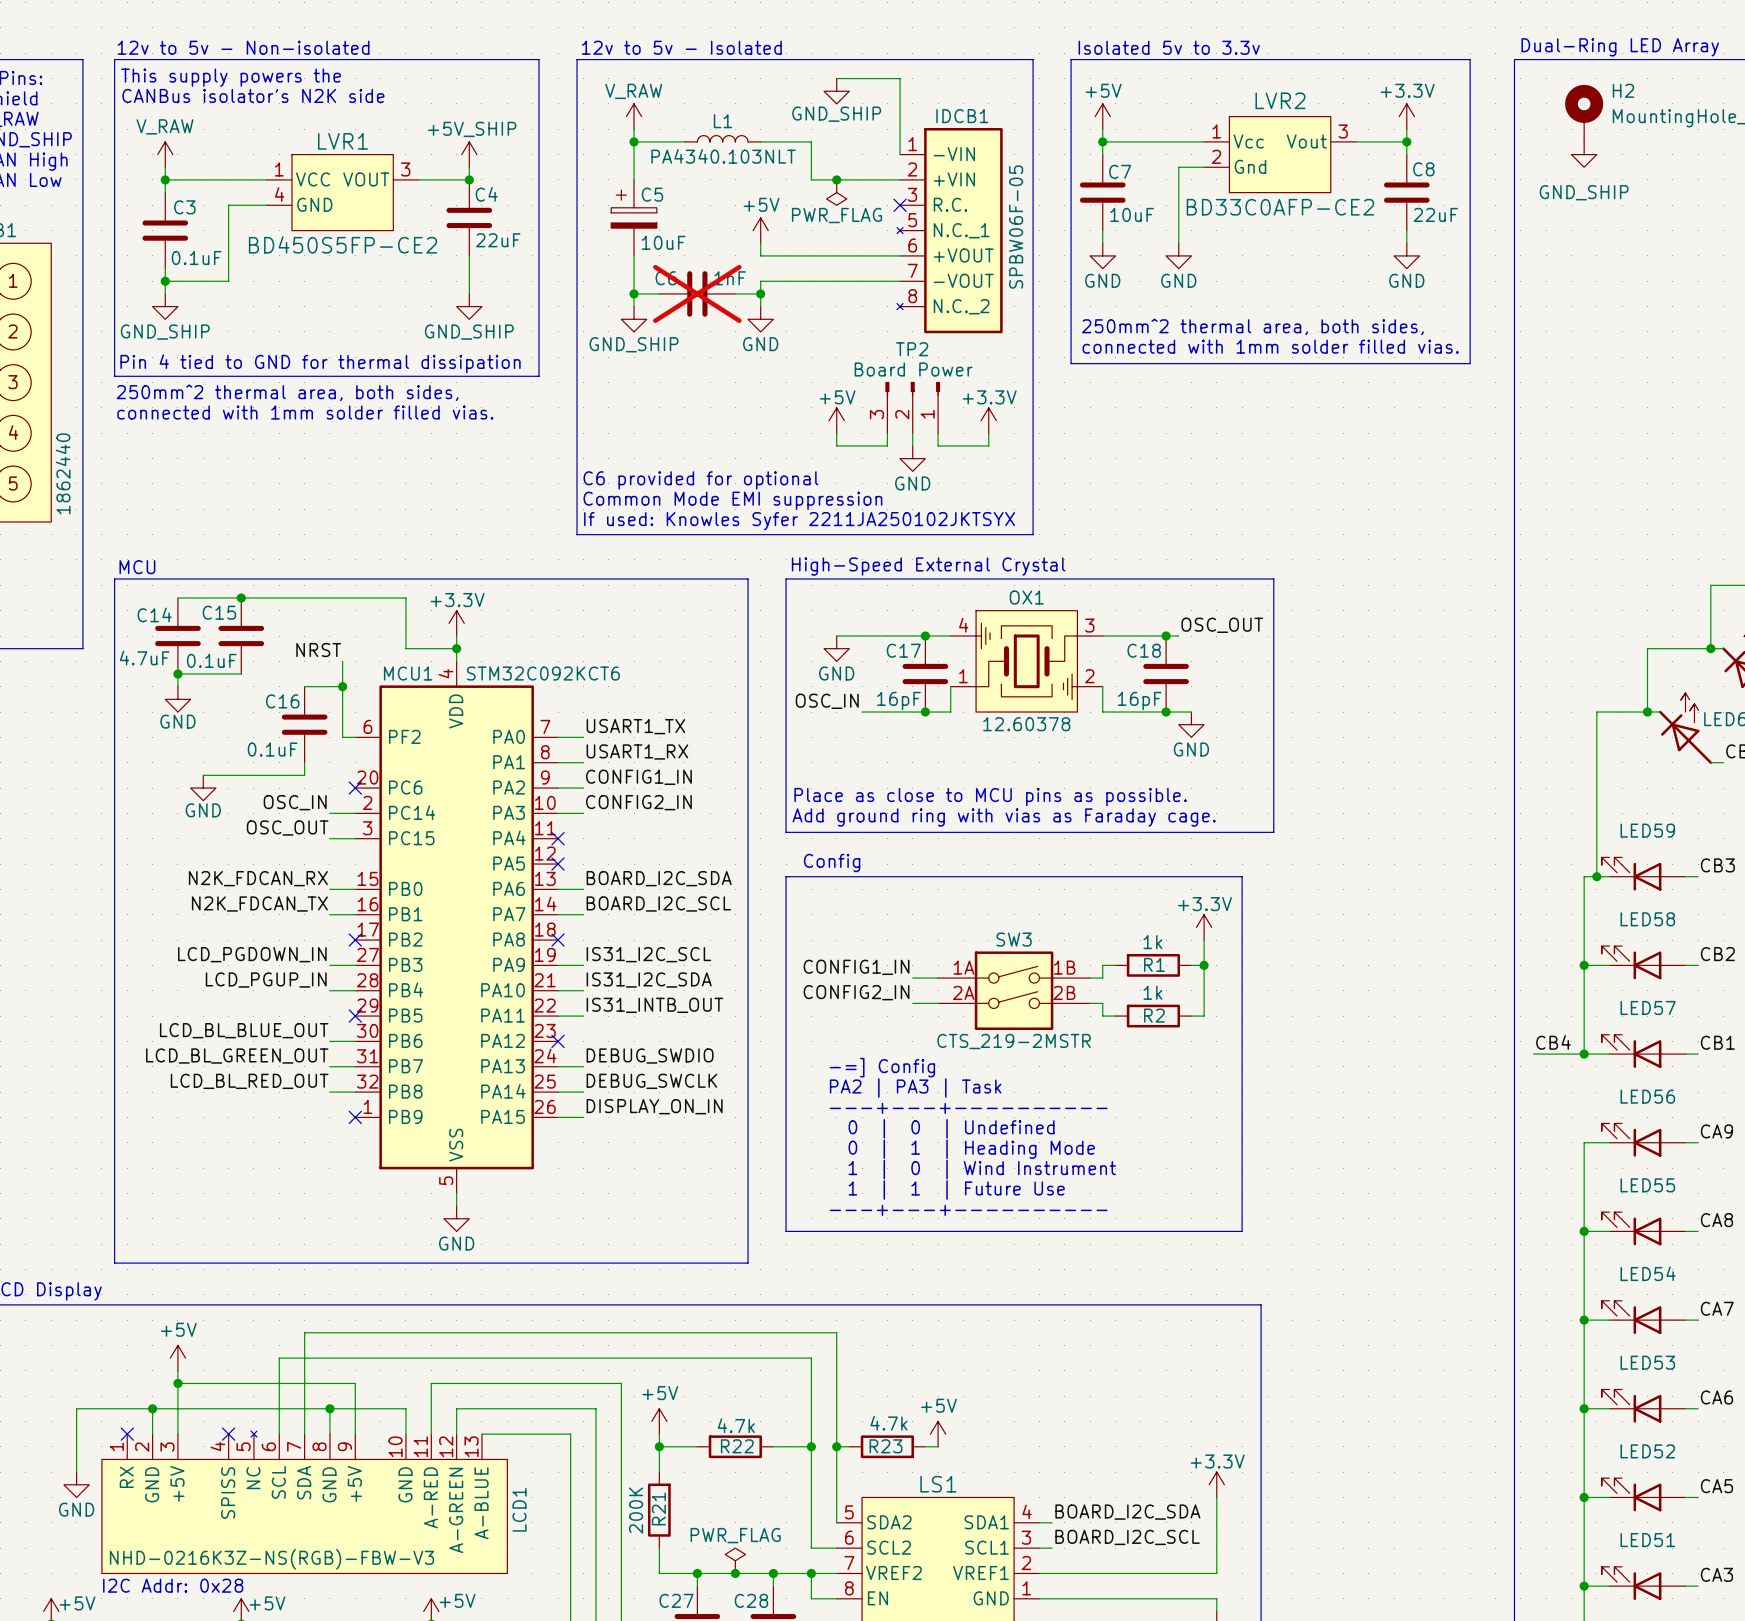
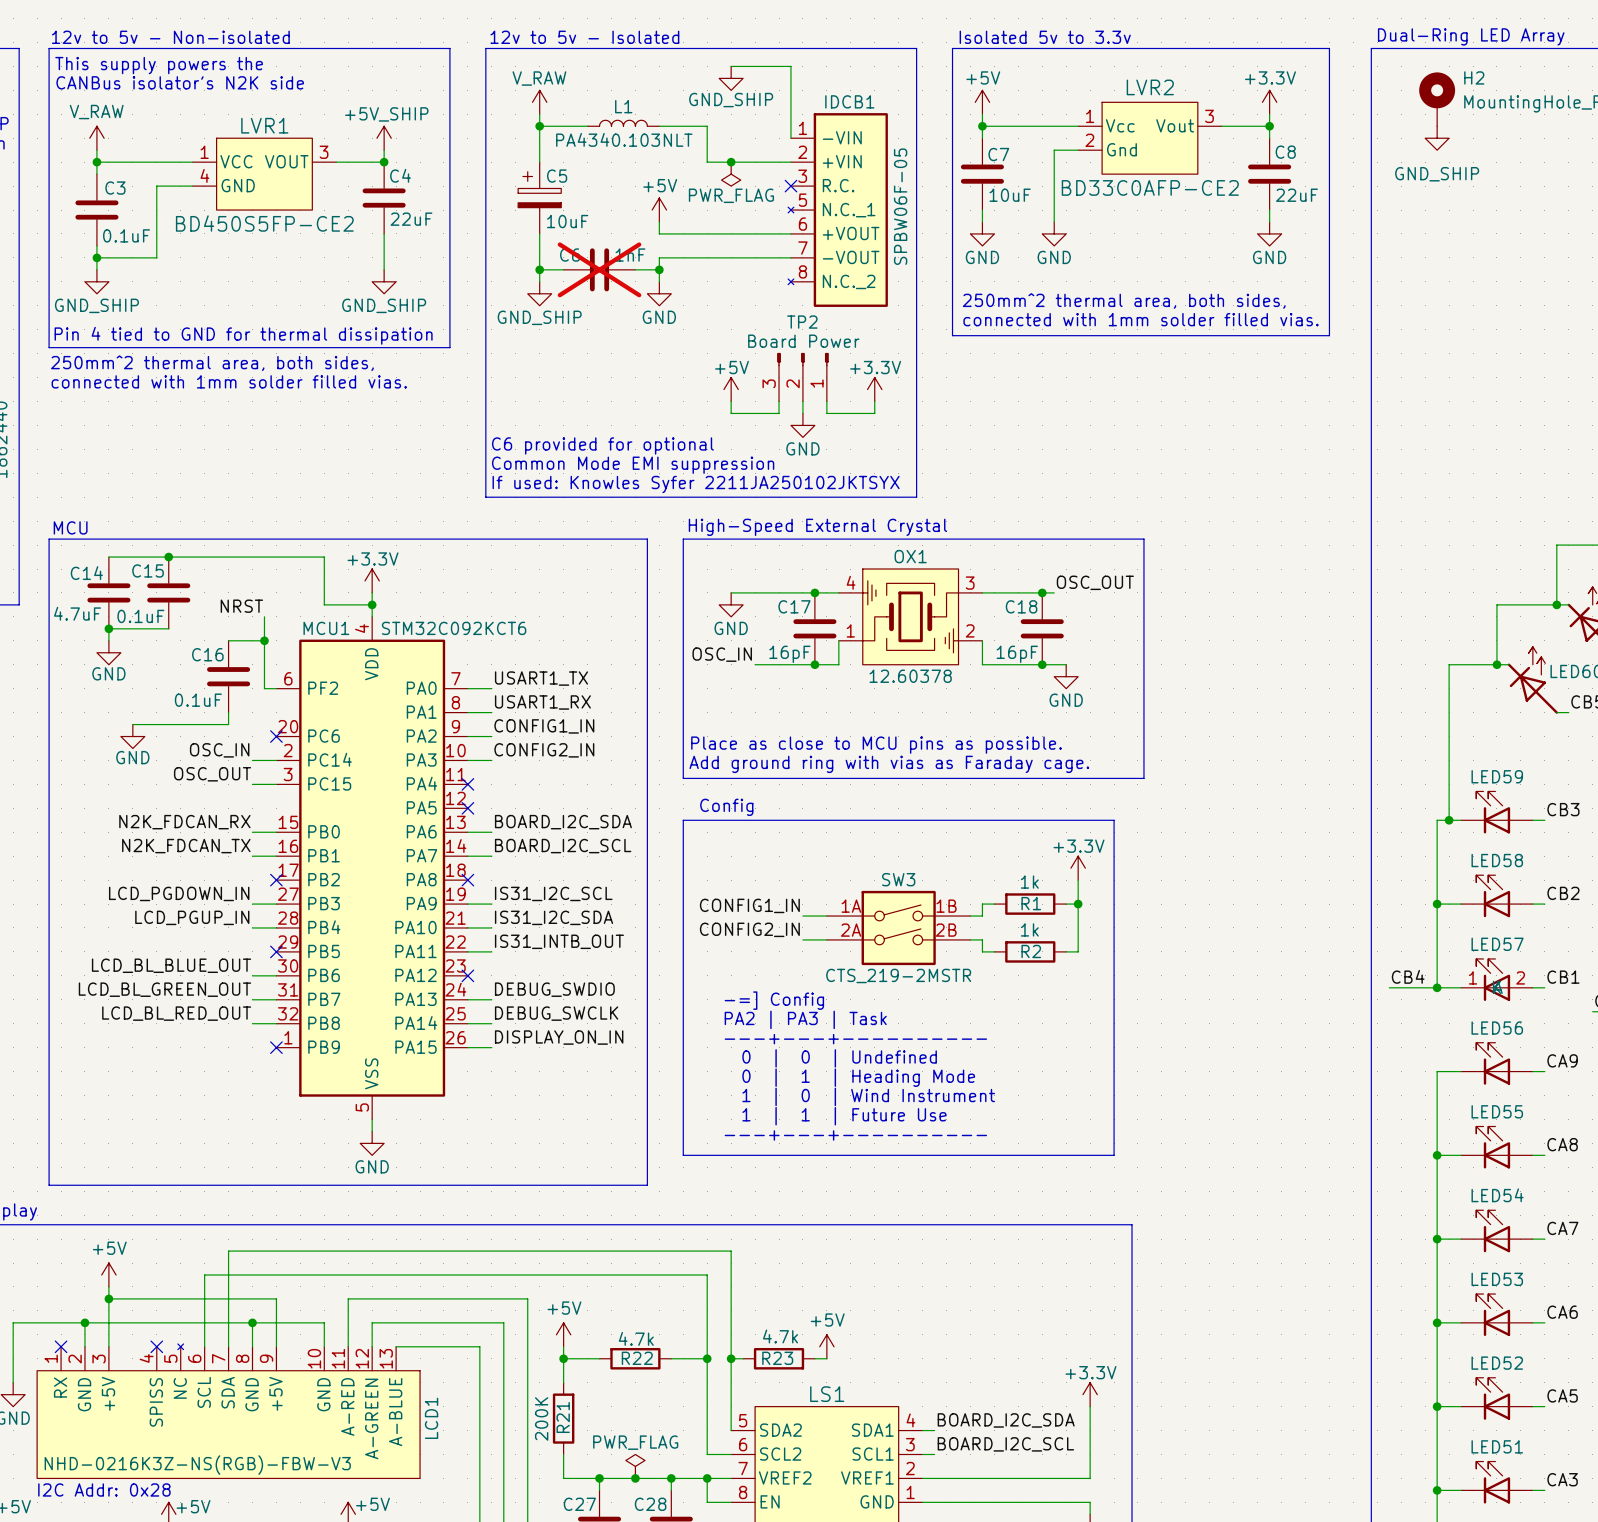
LED59 symbol: [1601, 857, 1686, 891] -> [1461, 791, 1533, 834]
LED58 symbol: [1601, 946, 1686, 980] -> [1461, 875, 1533, 918]
LED57 symbol: [1601, 1034, 1686, 1068] -> [1461, 958, 1533, 1001]
LED56 symbol: [1601, 1123, 1686, 1157] -> [1461, 1042, 1533, 1085]
LED55 symbol: [1601, 1212, 1686, 1246] -> [1461, 1126, 1533, 1169]
LED54 symbol: [1601, 1300, 1686, 1335] -> [1461, 1210, 1533, 1253]
LED53 symbol: [1601, 1389, 1686, 1423] -> [1461, 1294, 1533, 1337]
LED52 symbol: [1601, 1478, 1686, 1512] -> [1461, 1377, 1533, 1420]
LED51 symbol: [1601, 1566, 1686, 1601] -> [1461, 1461, 1533, 1504]

